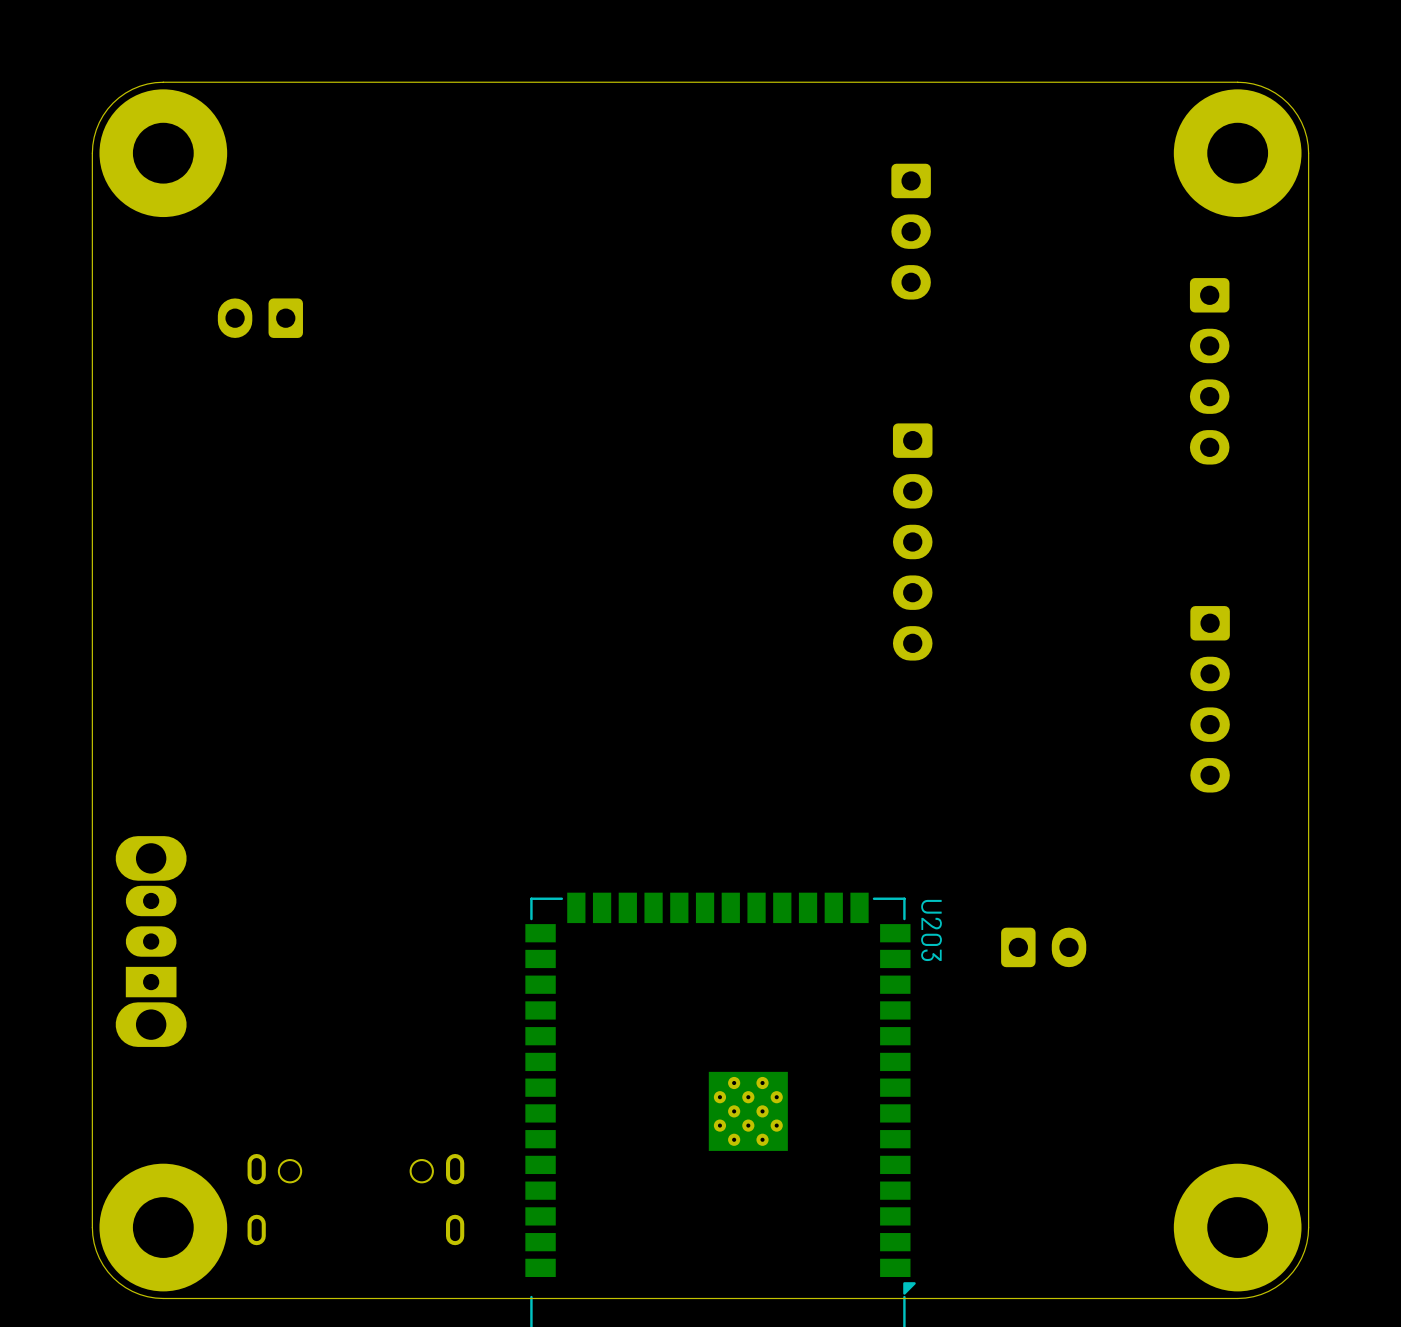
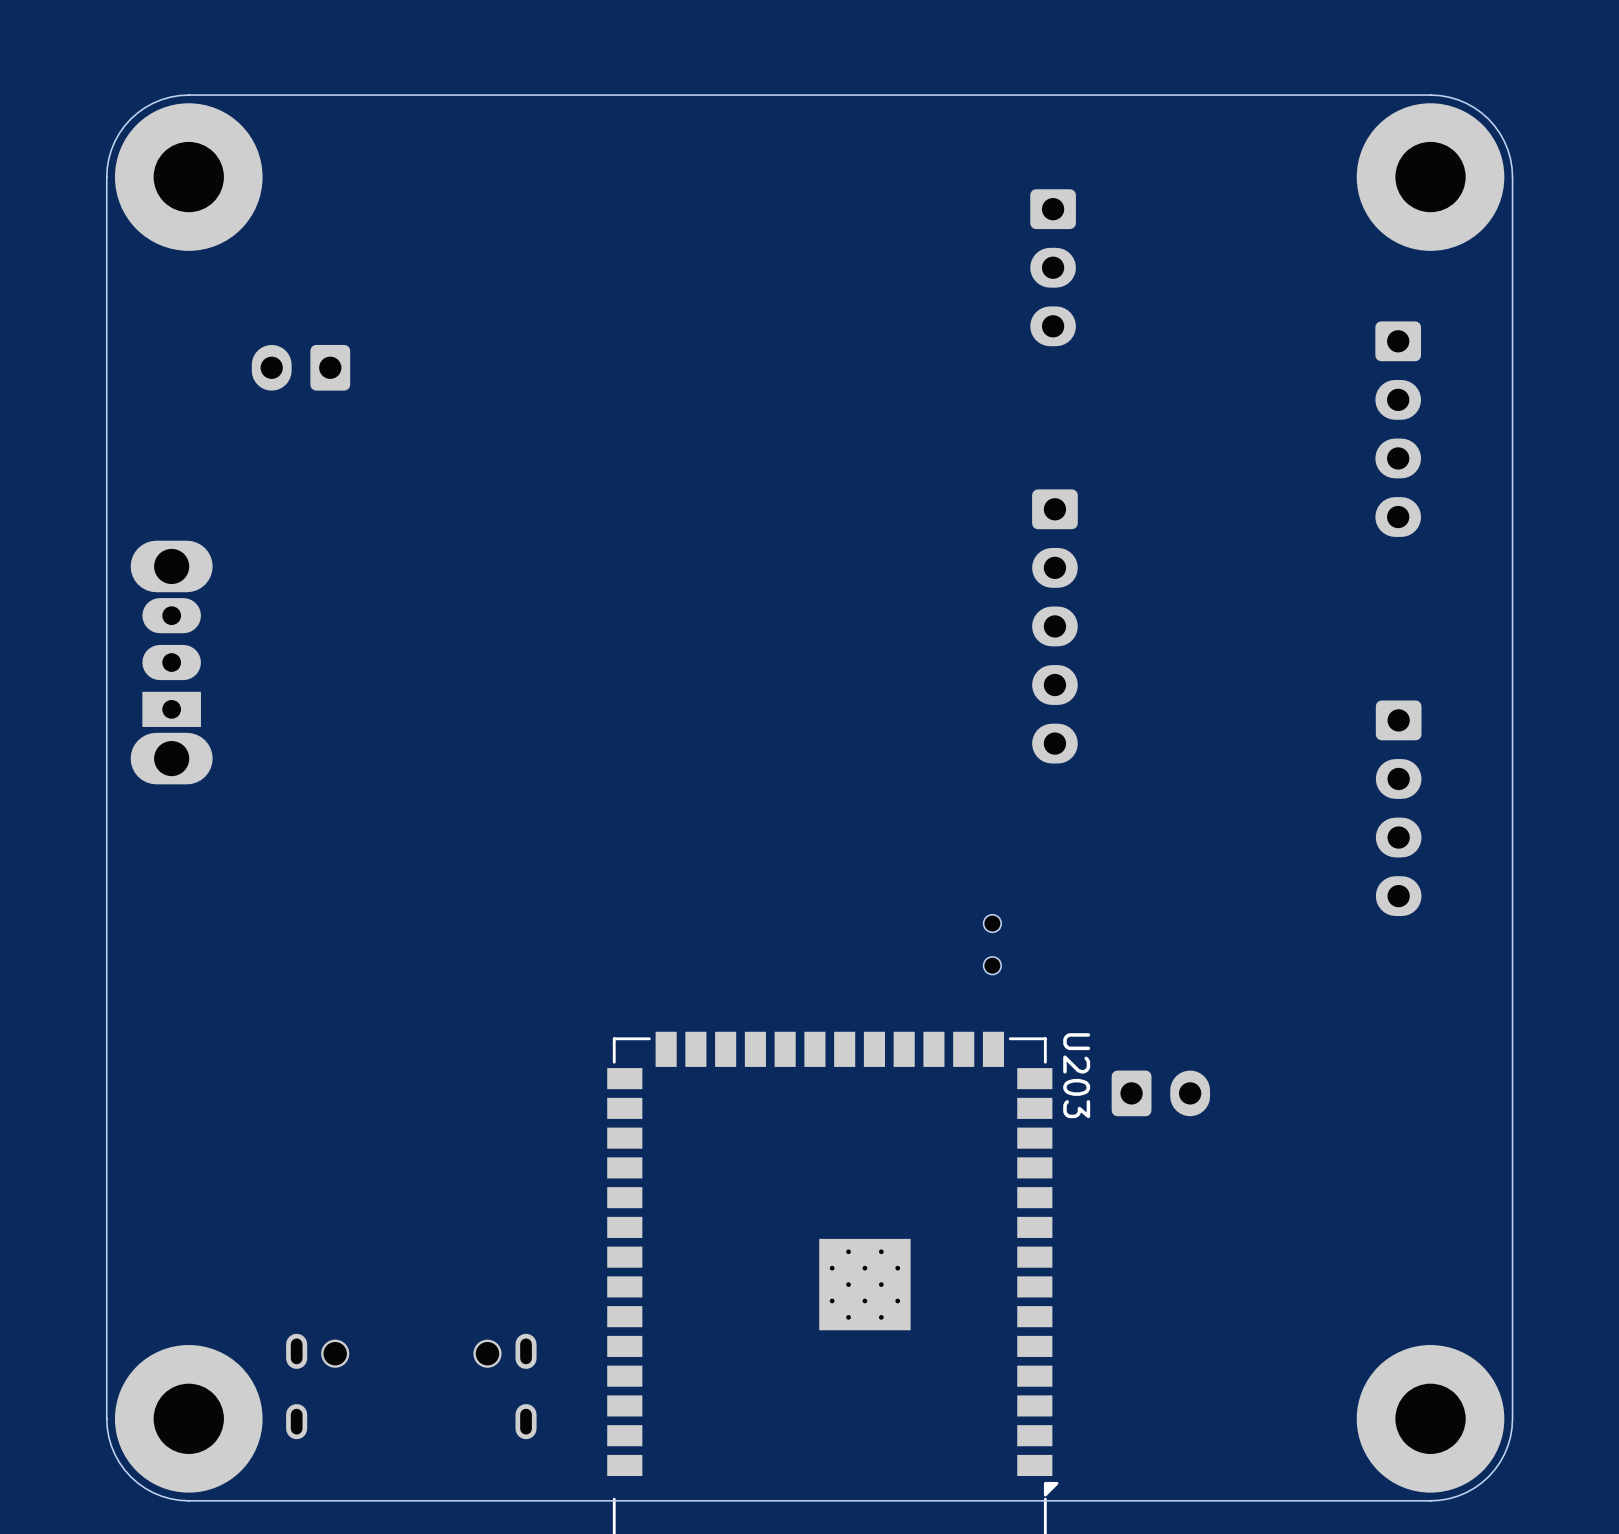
part: none -> (992, 944)
part position: (151, 941) -> (171, 662)
part position: (1043, 947) -> (1160, 1093)

